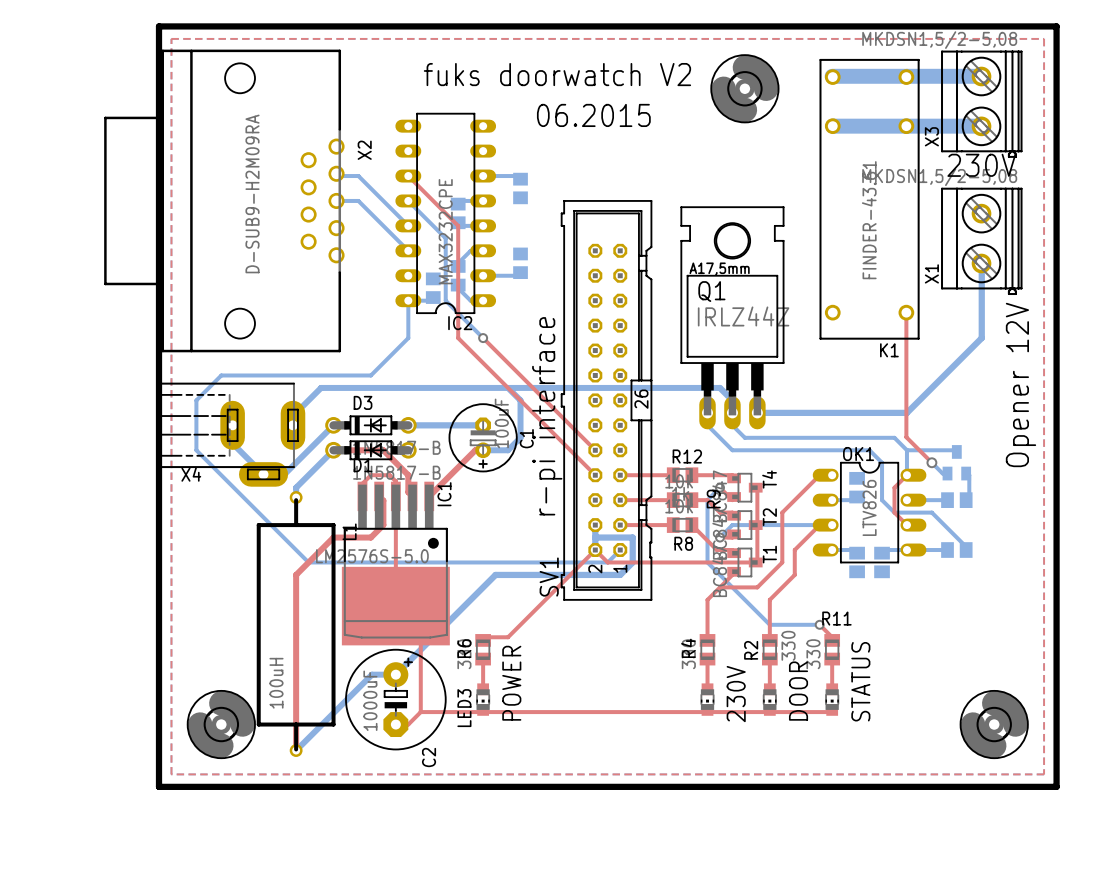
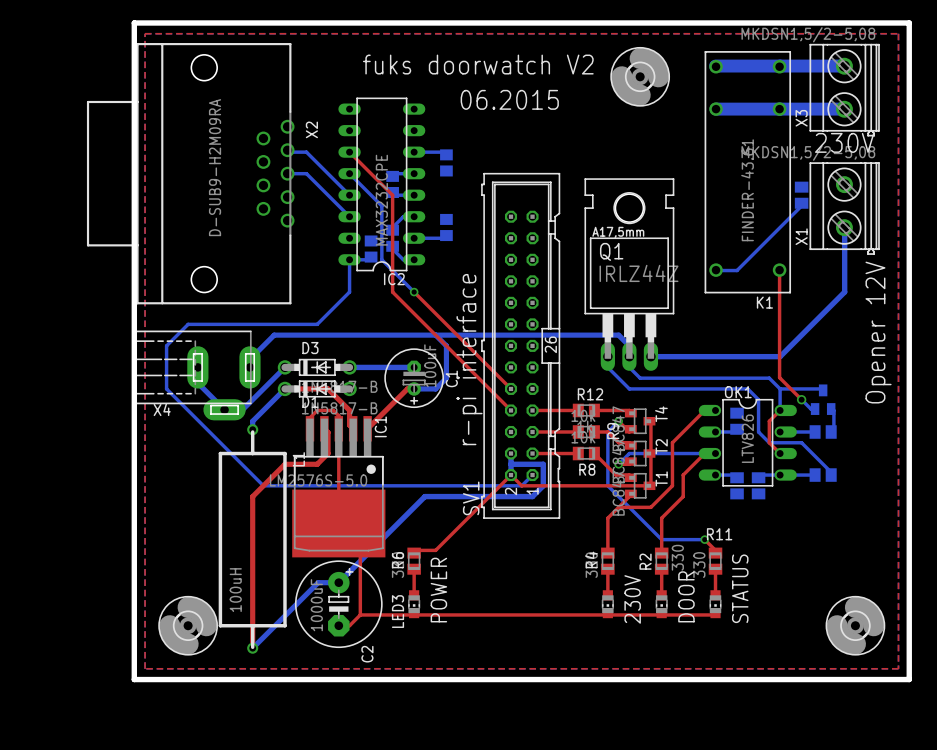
part: none -> (801, 195)
bottom track: none -> (801, 203) (801, 205) (737, 270) (716, 270)

